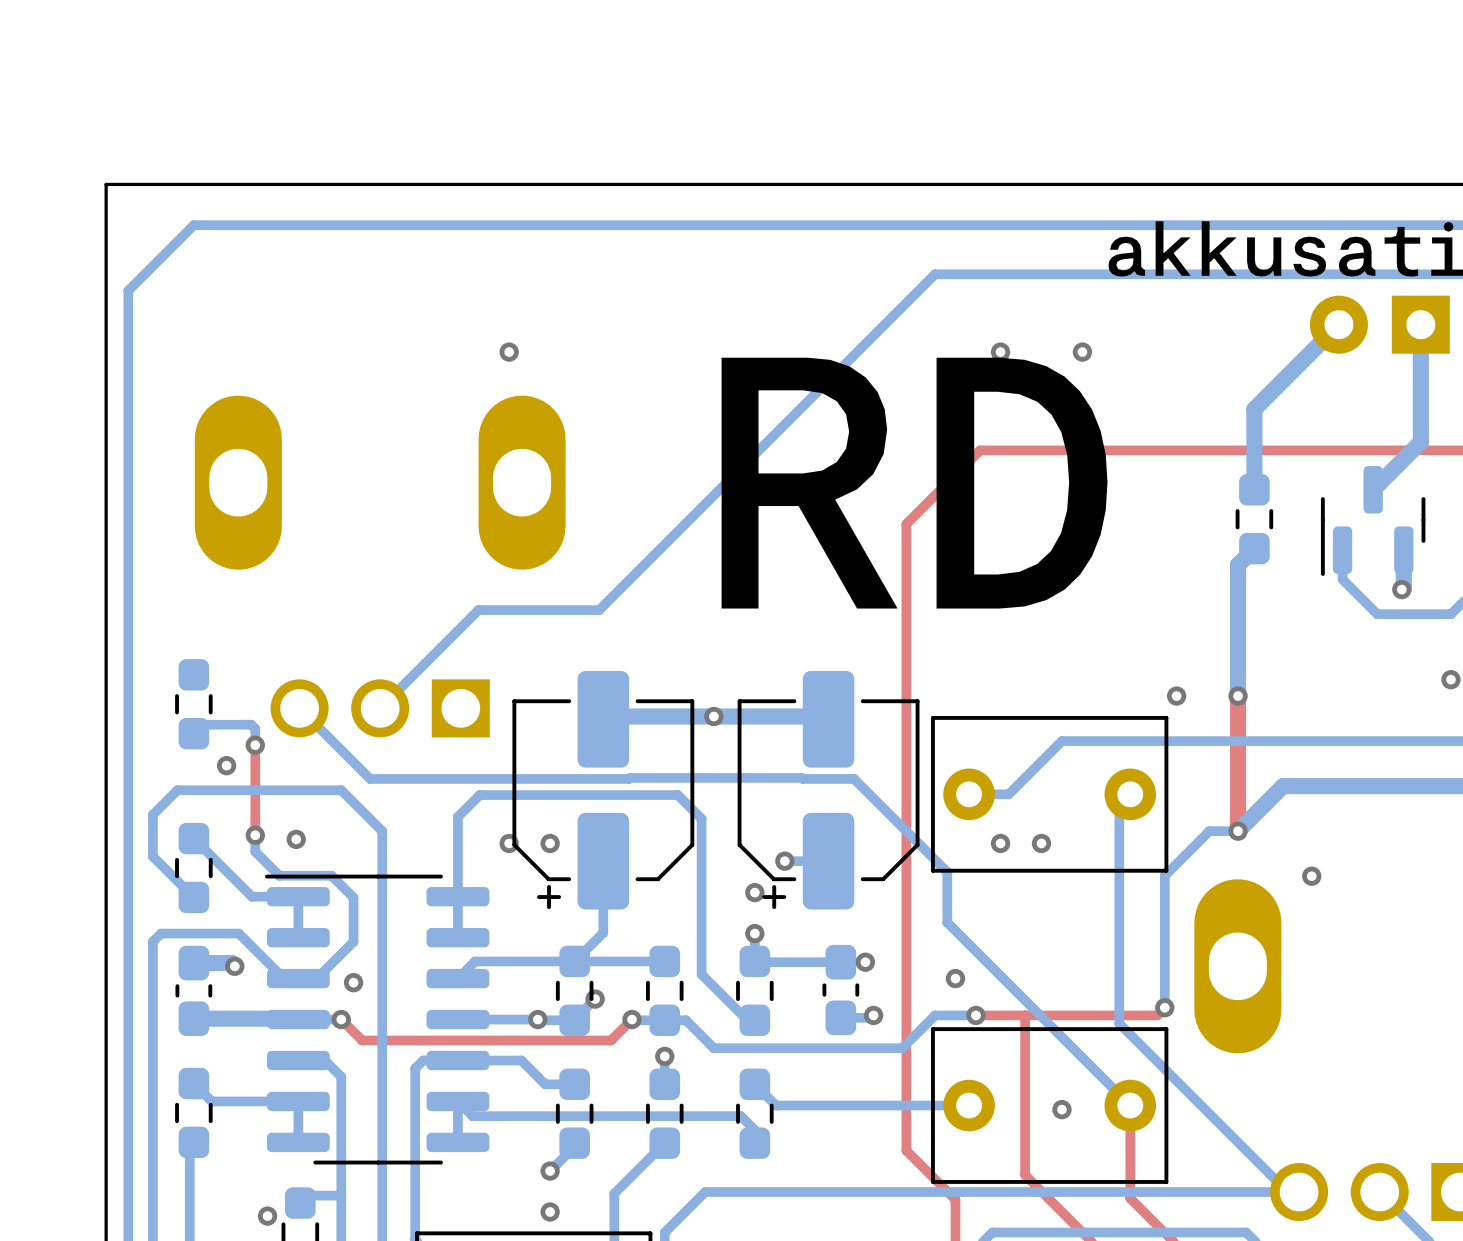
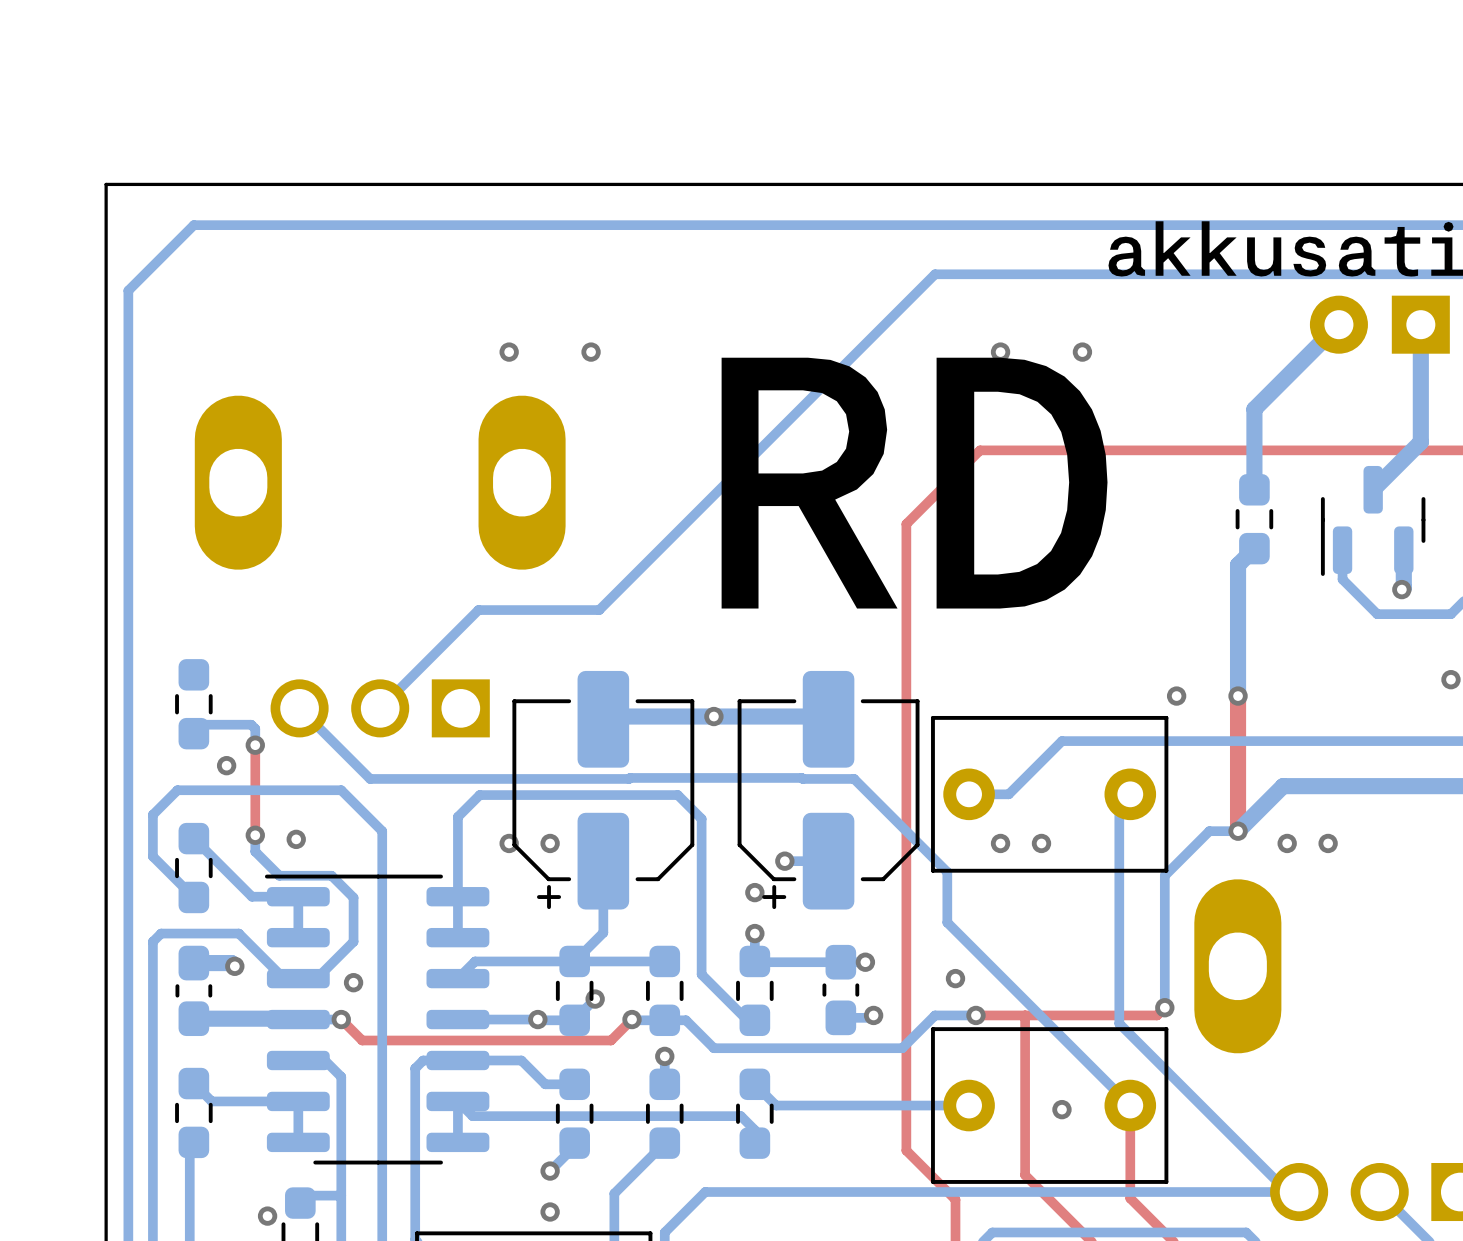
via: none -> (591, 352)
via: none -> (1287, 843)
via: none -> (1328, 843)
via: (1311, 876) -> none

